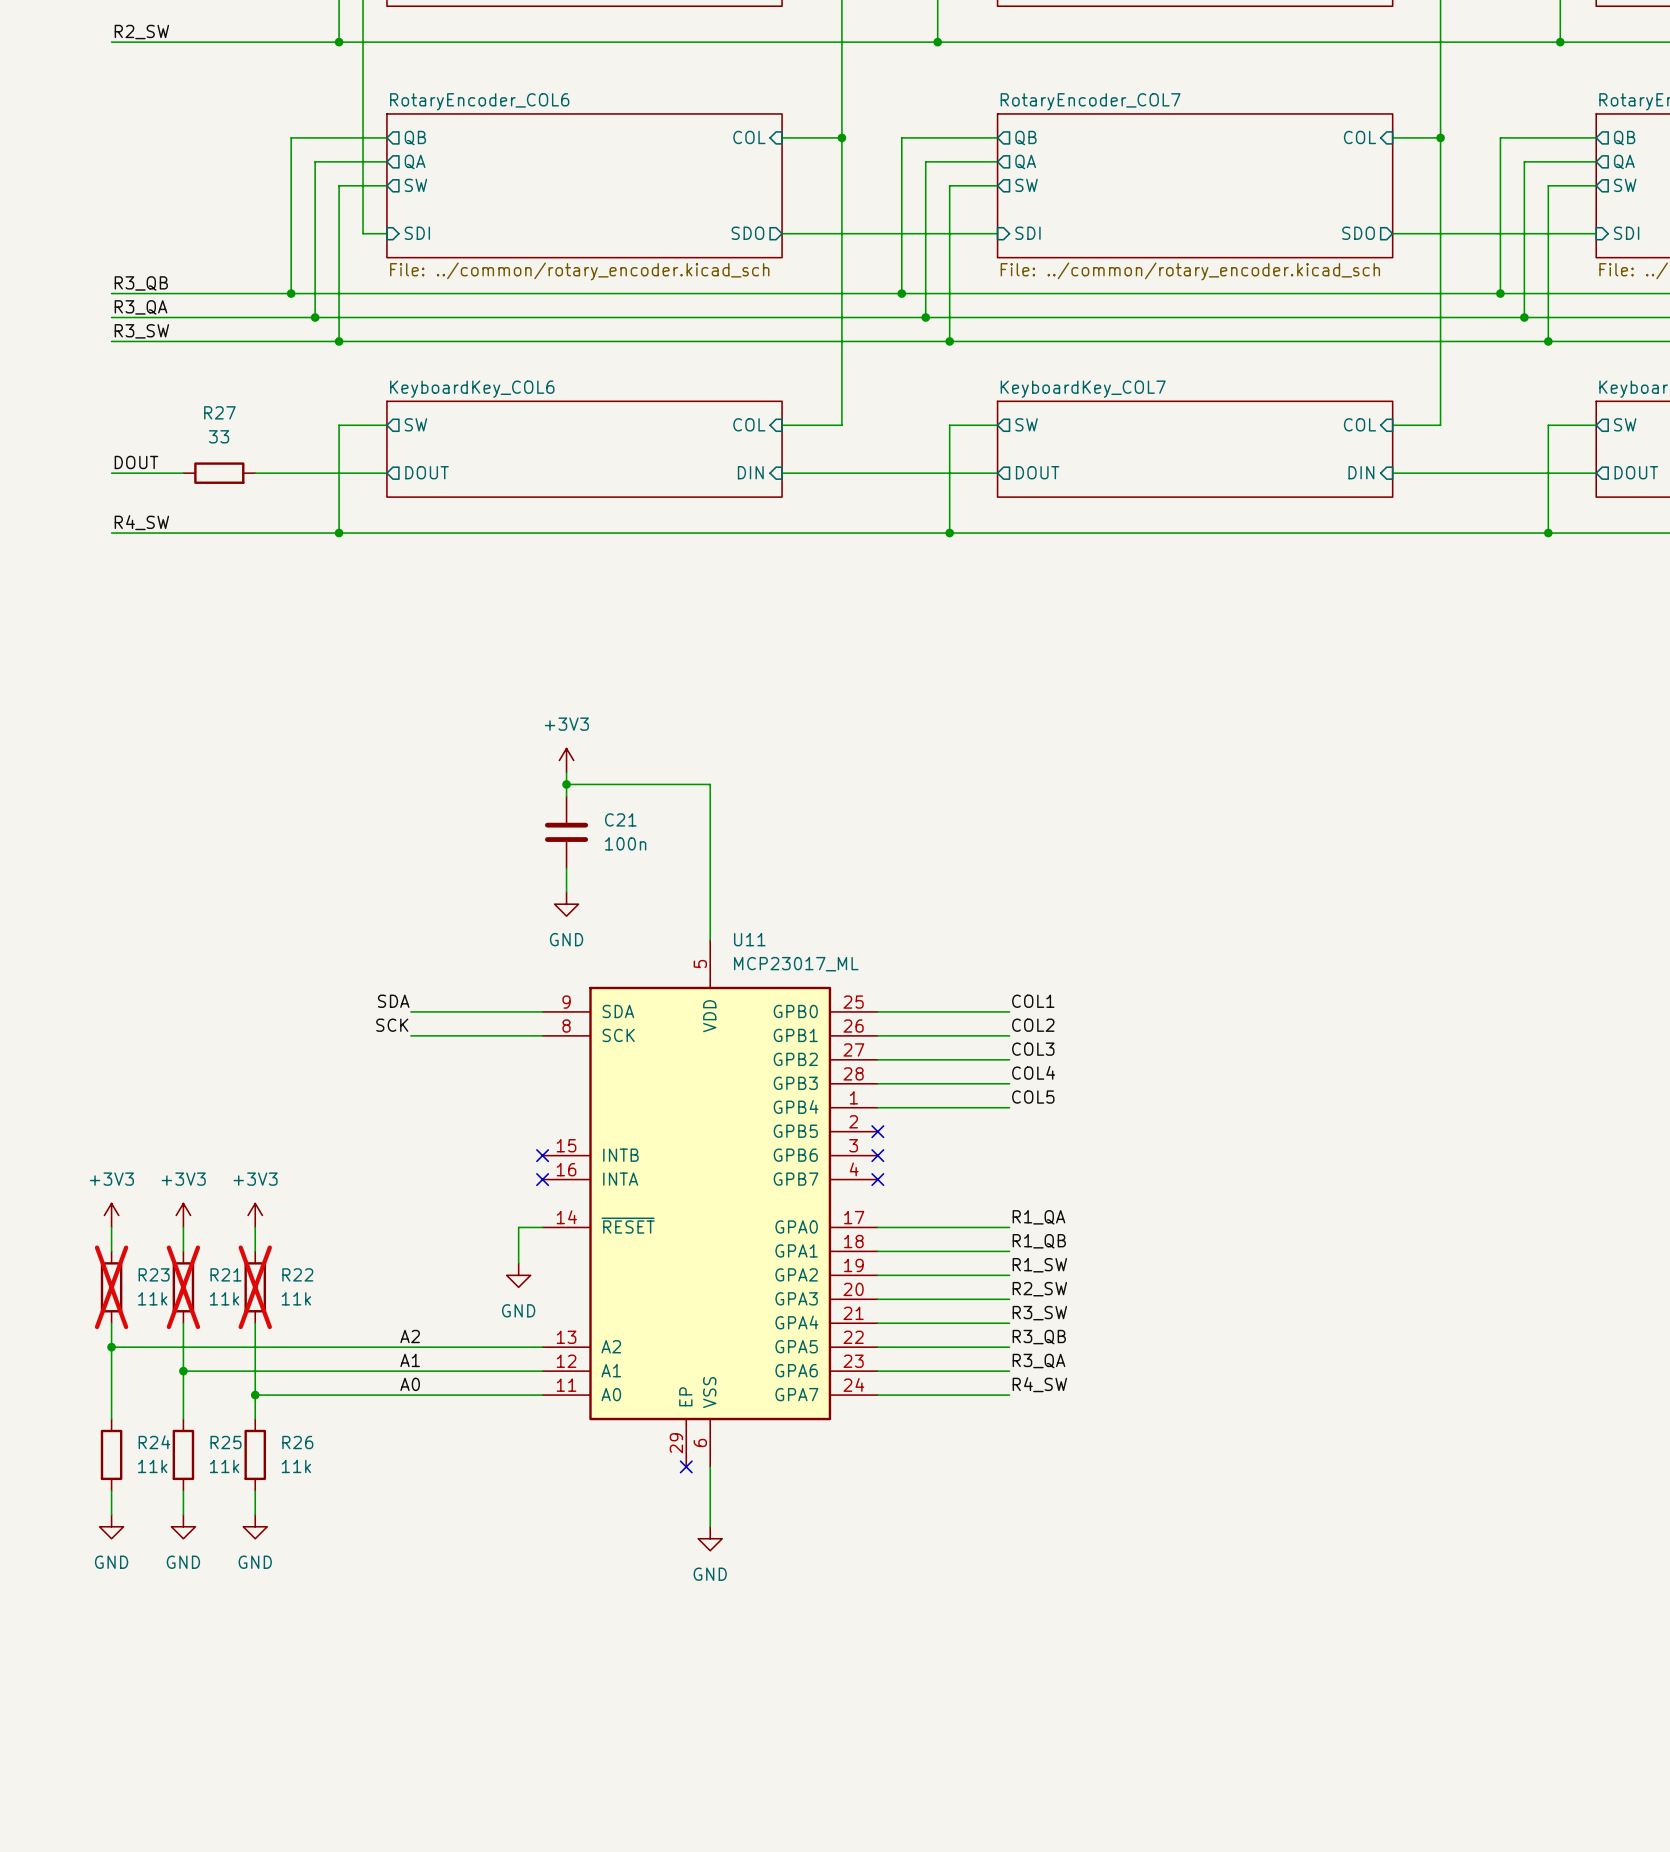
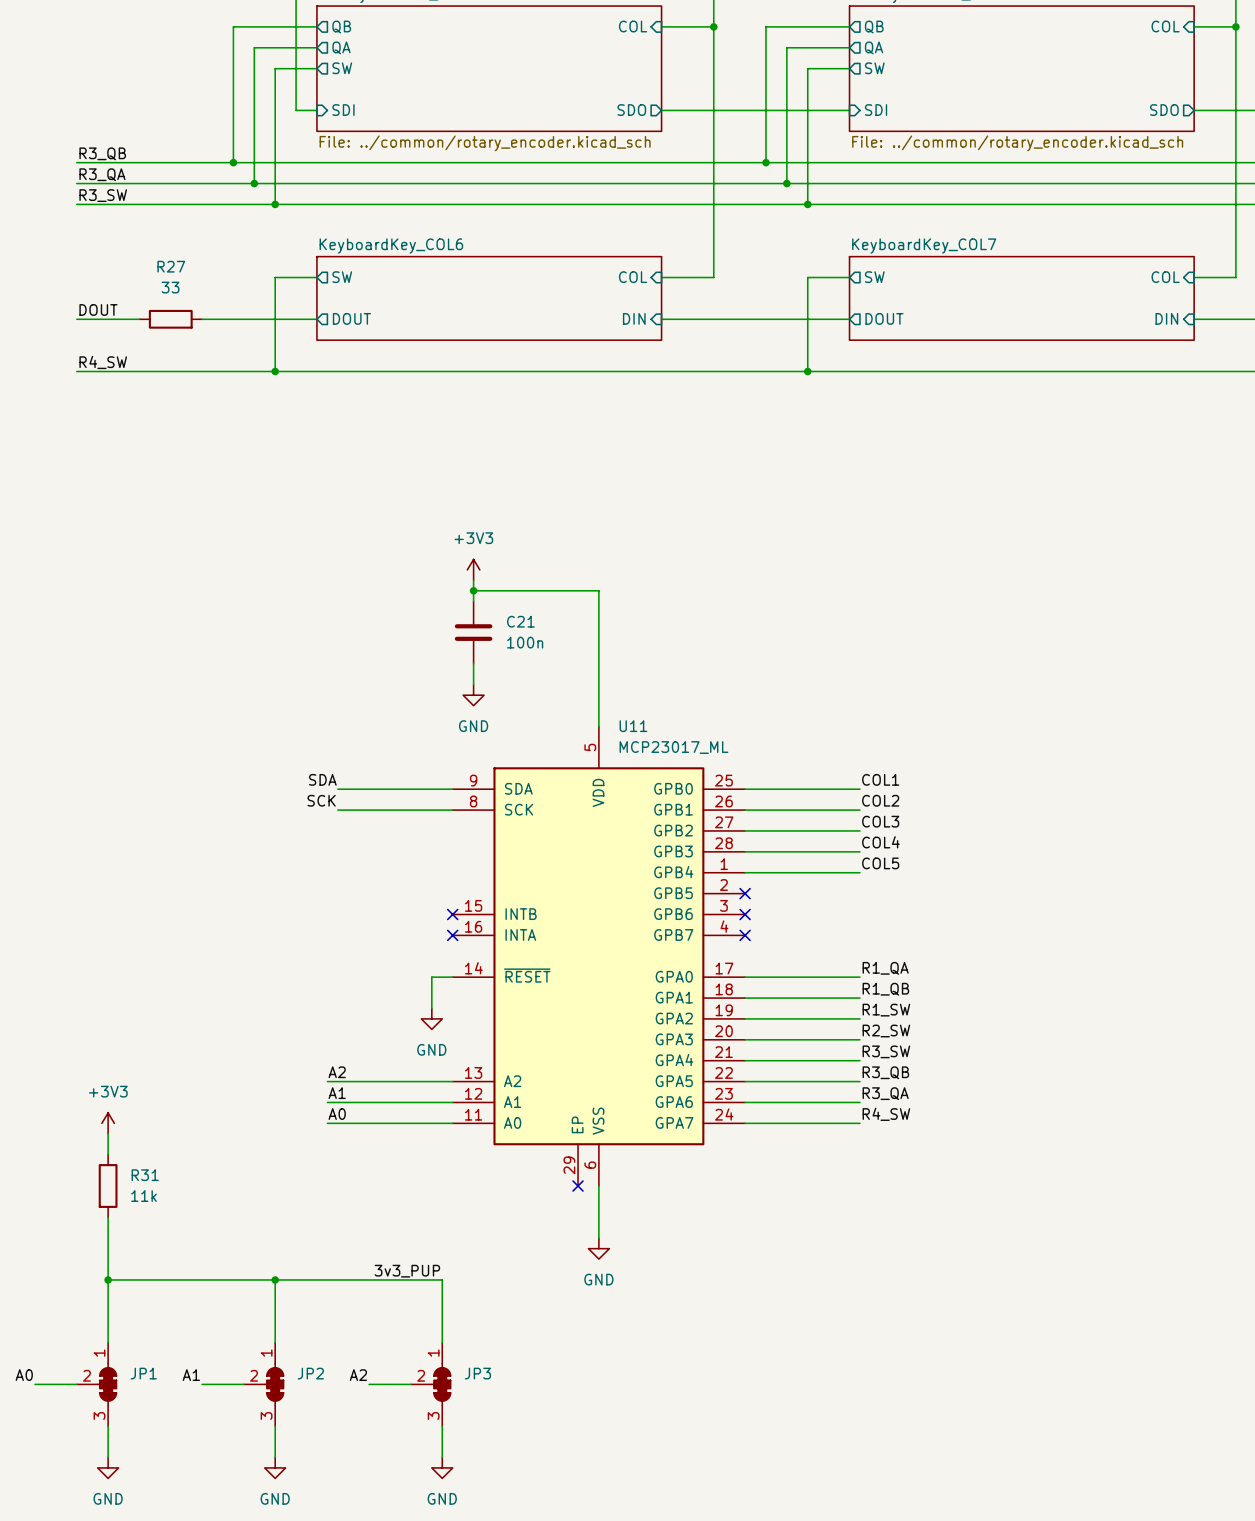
power symbol: +3V3 (111, 1215) -> none
power symbol: +3V3 (183, 1215) -> none
power symbol: +3V3 (255, 1215) -> none
wire: (111, 1227) (111, 1251) -> none
wire: (183, 1227) (183, 1251) -> none
wire: (255, 1227) (255, 1251) -> none
R23: 11k (111, 1287) -> none
R21: 11k (183, 1287) -> none
R22: 11k (255, 1287) -> none
wire: (111, 1323) (111, 1419) -> none
wire: (183, 1323) (183, 1419) -> none
wire: (255, 1323) (255, 1419) -> none
wire: (111, 1347) (398, 1347) -> none
junction: (111, 1347) -> none
wire: (183, 1371) (398, 1371) -> none
junction: (183, 1371) -> none
power symbol: none -> +3V3 (108, 1123)
wire: (255, 1395) (398, 1395) -> none
junction: (255, 1395) -> none
R24: 11k (111, 1454) -> none
R25: 11k (183, 1454) -> none
R26: 11k (255, 1454) -> none
R31: none -> 11k (108, 1186)
wire: (111, 1490) (111, 1514) -> (108, 1133) (108, 1154)
wire: (183, 1490) (183, 1514) -> none
wire: (255, 1490) (255, 1514) -> none
wire: none -> (108, 1217) (108, 1342)
power symbol: GND (111, 1526) -> none
power symbol: GND (183, 1526) -> none
power symbol: GND (255, 1526) -> none
label: none -> 3v3_PUP (407, 1271)
wire: none -> (108, 1279) (442, 1279) (442, 1342)
junction: none -> (108, 1279)
wire: none -> (275, 1279) (275, 1342)
junction: none -> (275, 1279)
label: none -> A0 (24, 1375)
label: none -> A1 (191, 1375)
label: none -> A2 (358, 1375)
wire: none -> (35, 1384) (76, 1384)
JP1: none -> (96, 1384)
wire: none -> (202, 1384) (243, 1384)
JP2: none -> (263, 1384)
wire: none -> (369, 1384) (410, 1384)
JP3: none -> (430, 1384)
wire: none -> (108, 1426) (108, 1457)
wire: none -> (275, 1426) (275, 1457)
wire: none -> (442, 1426) (442, 1457)
power symbol: none -> GND (108, 1467)
power symbol: none -> GND (275, 1467)
power symbol: none -> GND (442, 1467)

